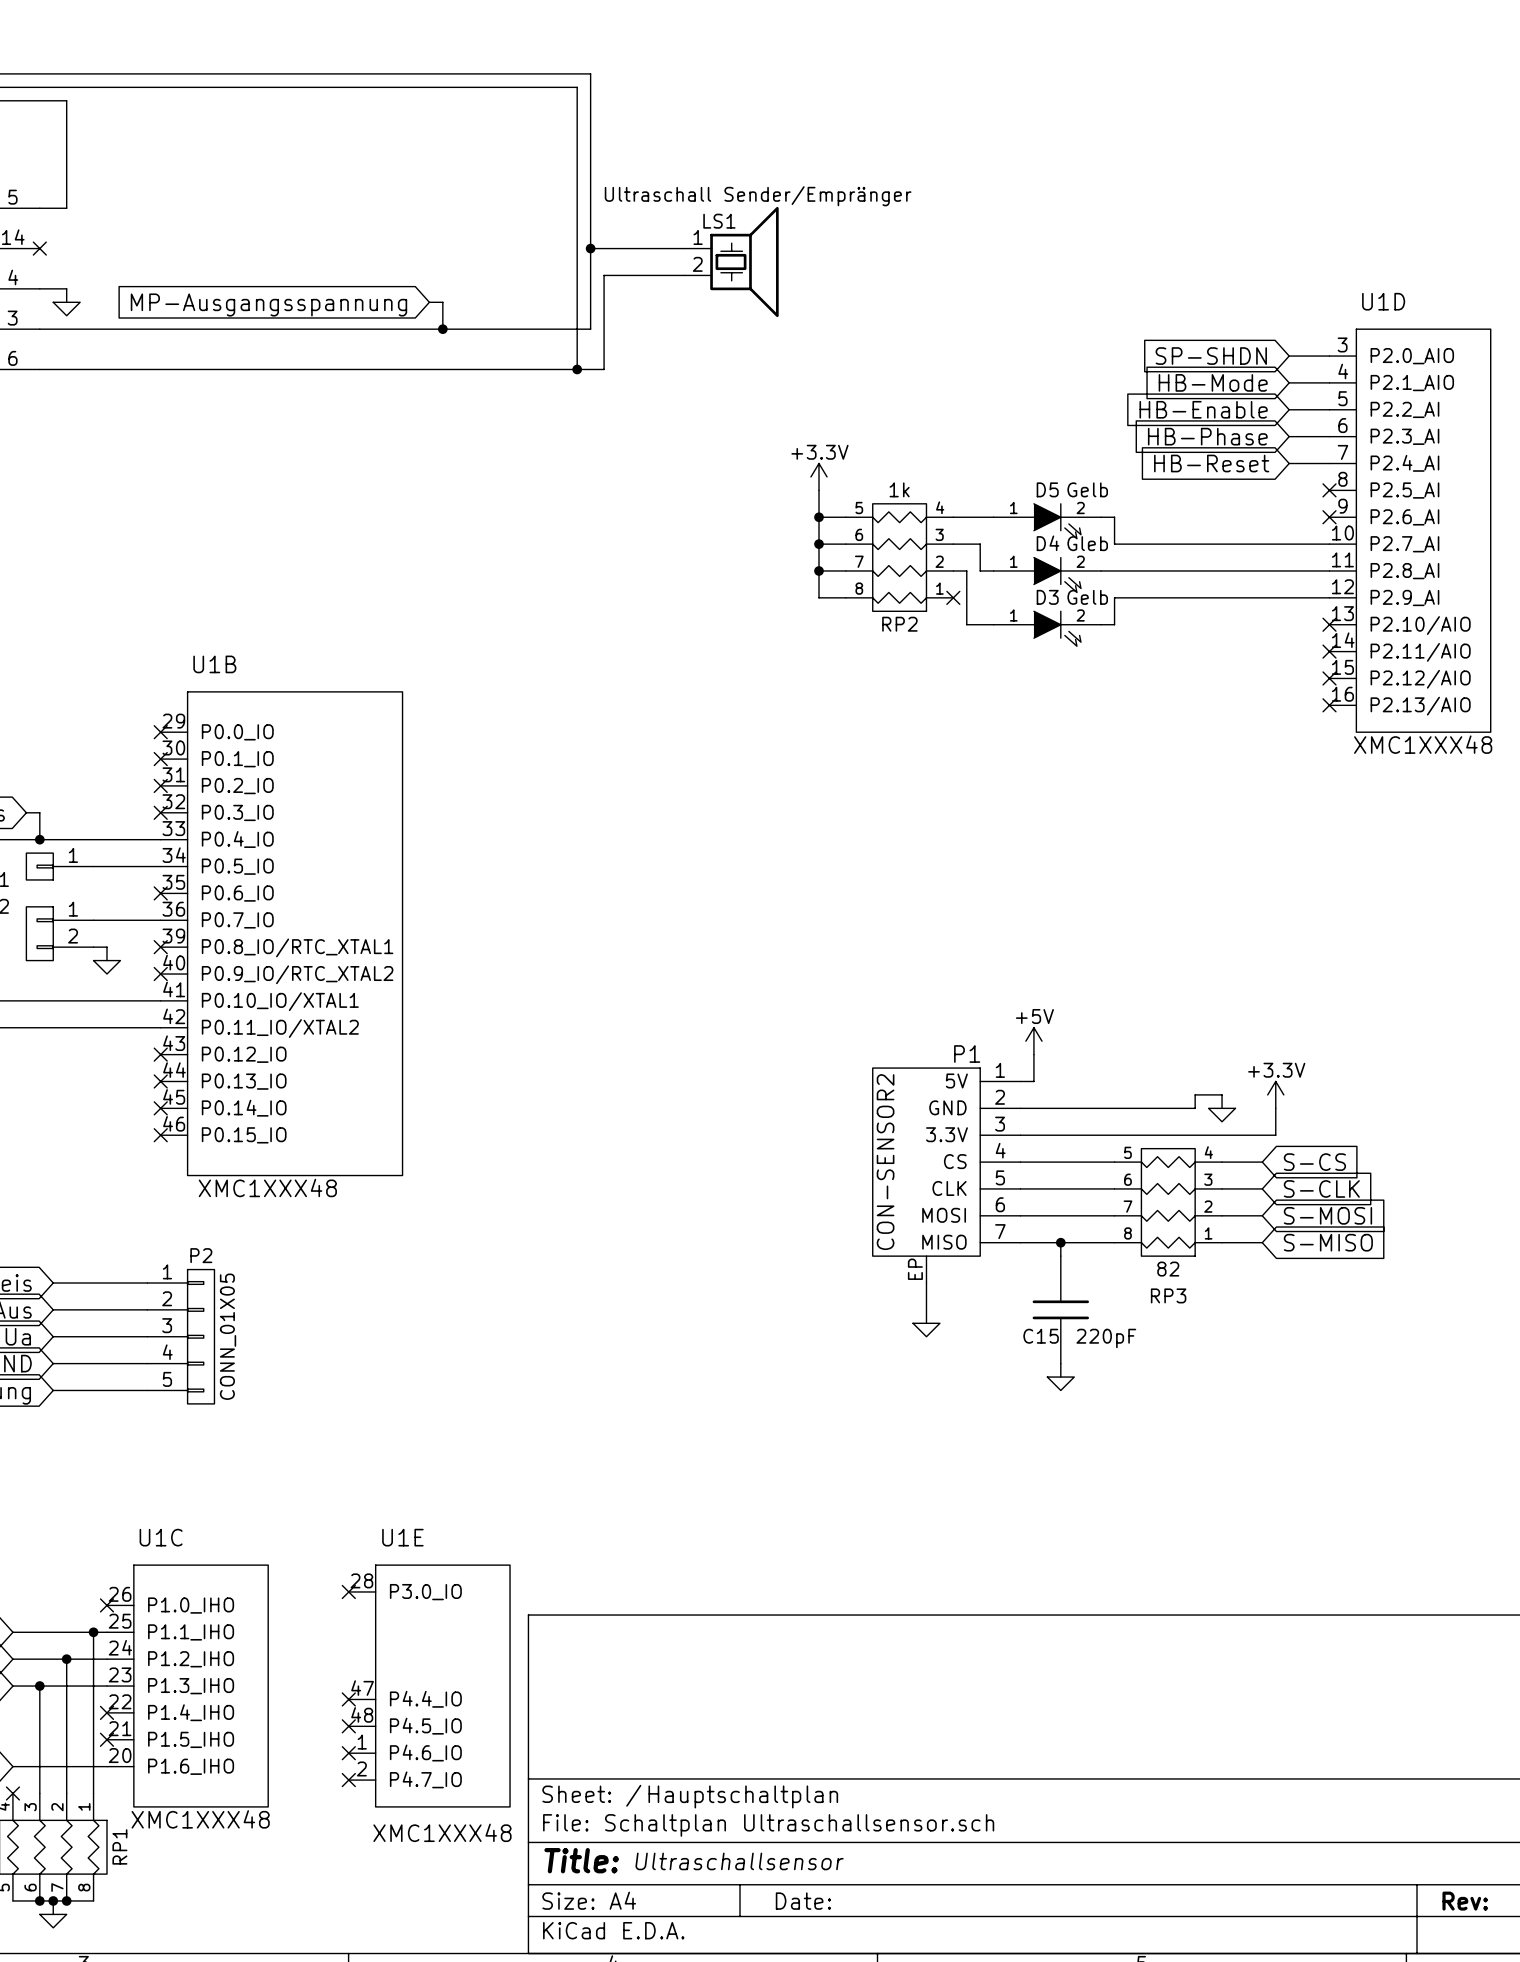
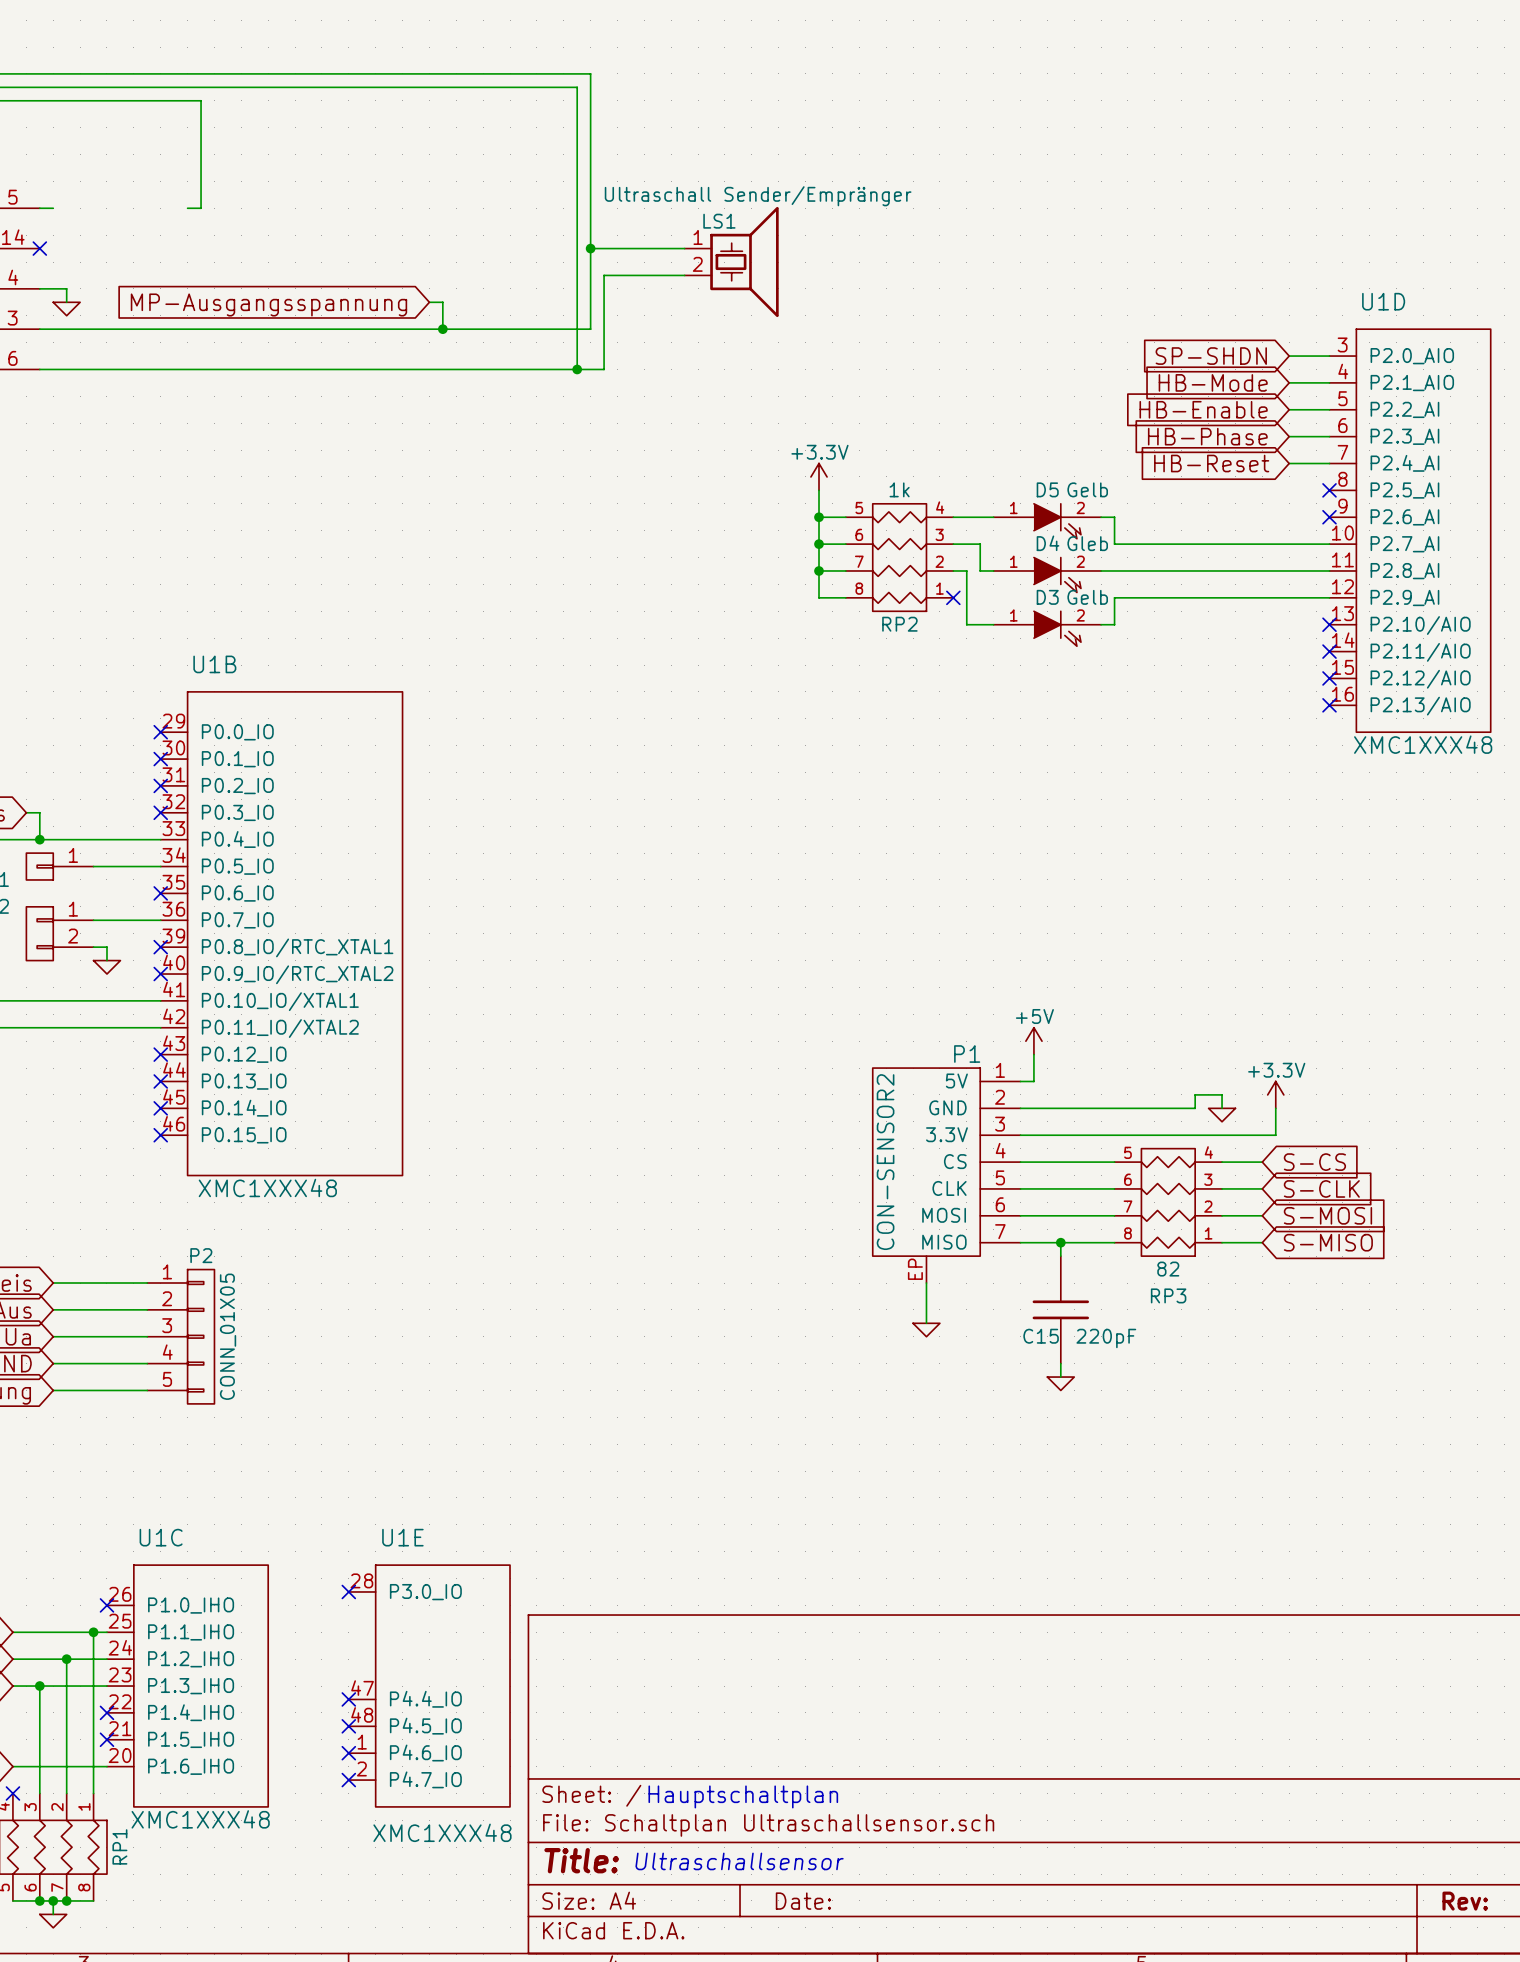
wire: (66, 100) (66, 208) (53, 208) -> (66, 100) (201, 100) (201, 208) (187, 208)

